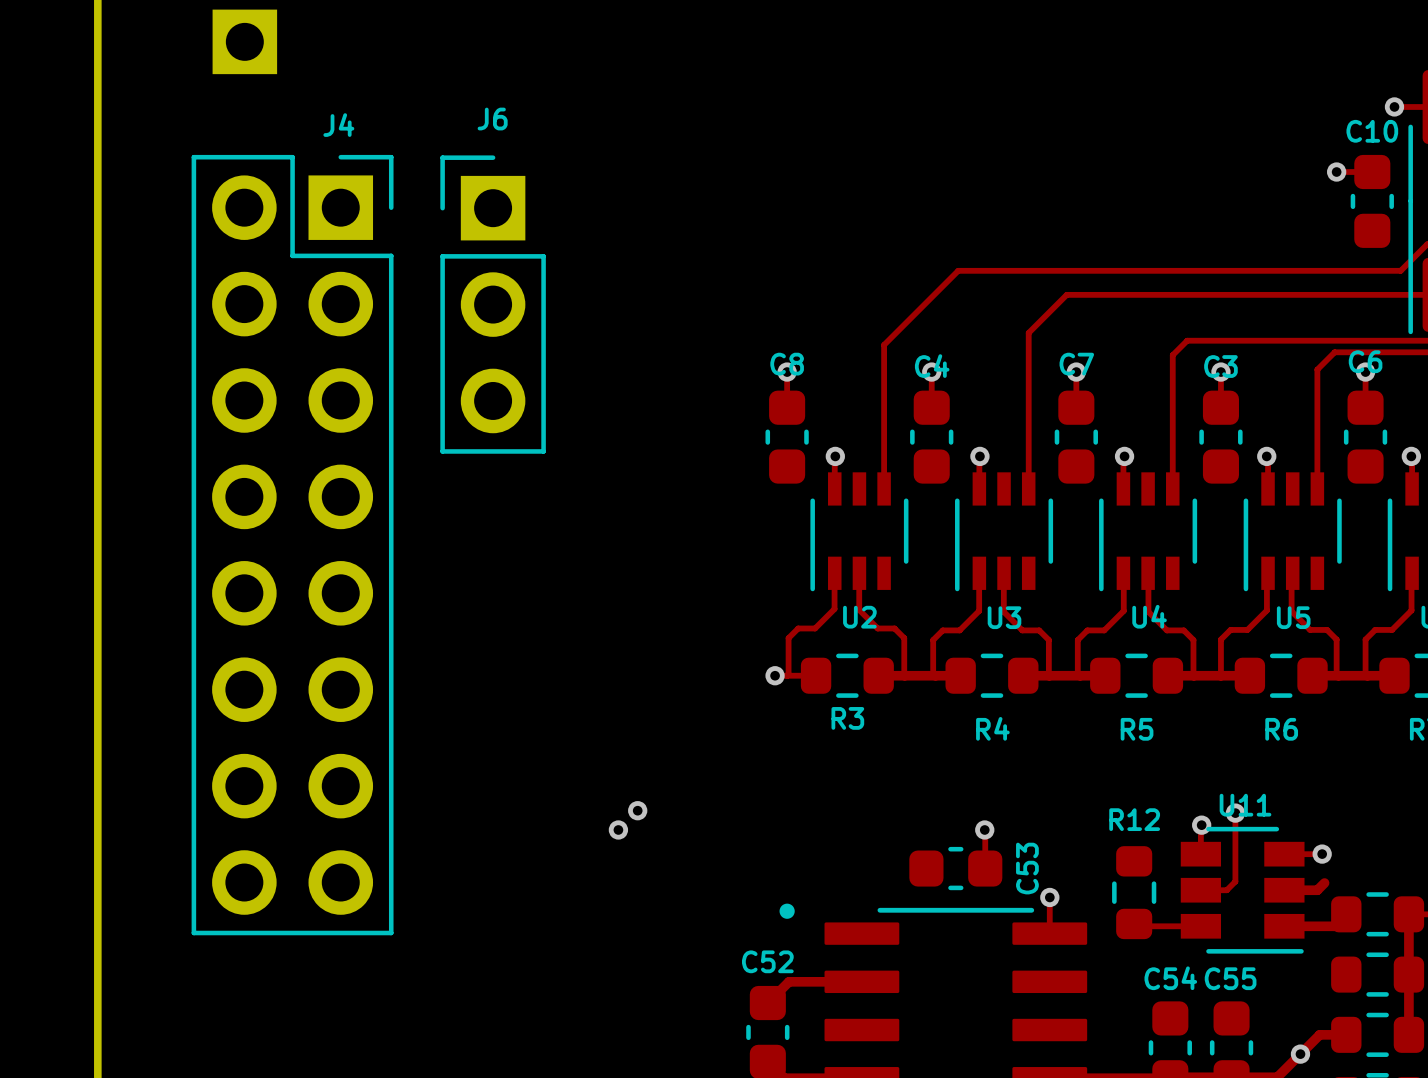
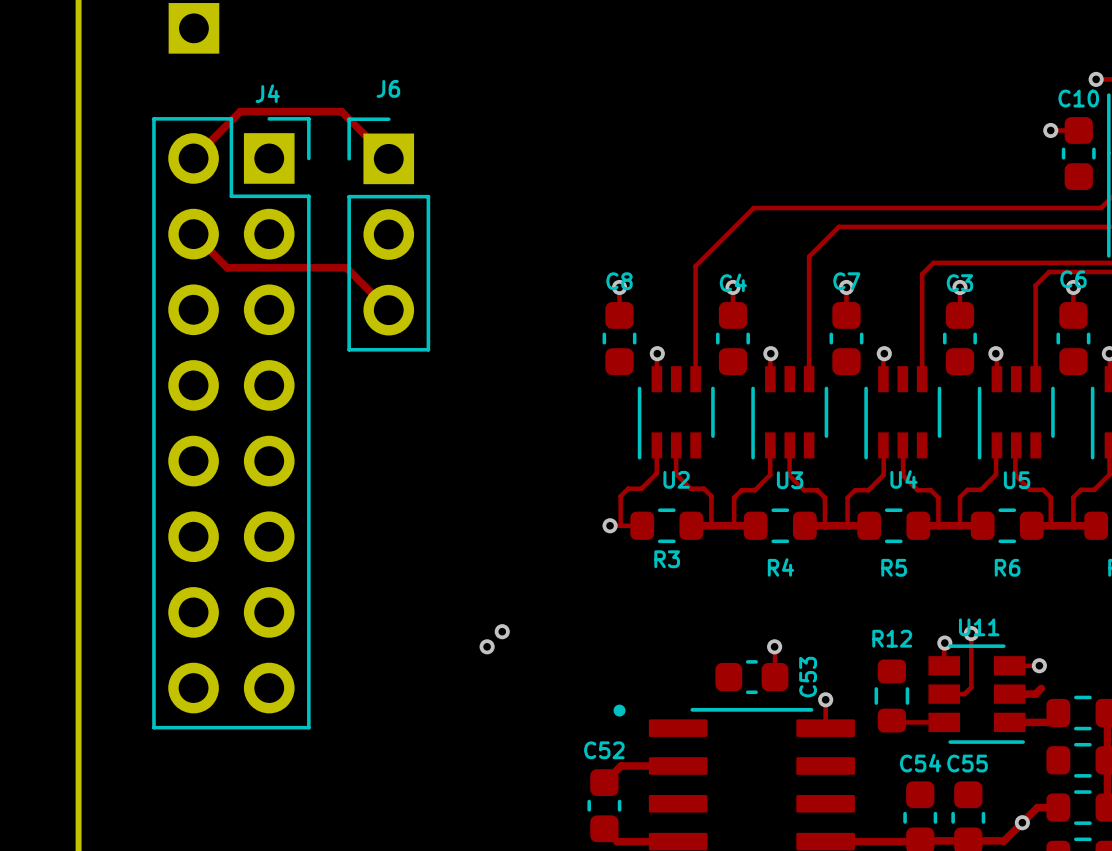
top track: none -> (193, 158) (240, 111) (341, 111) (388, 158)
top track: none -> (193, 234) (227, 267) (346, 267) (388, 310)

